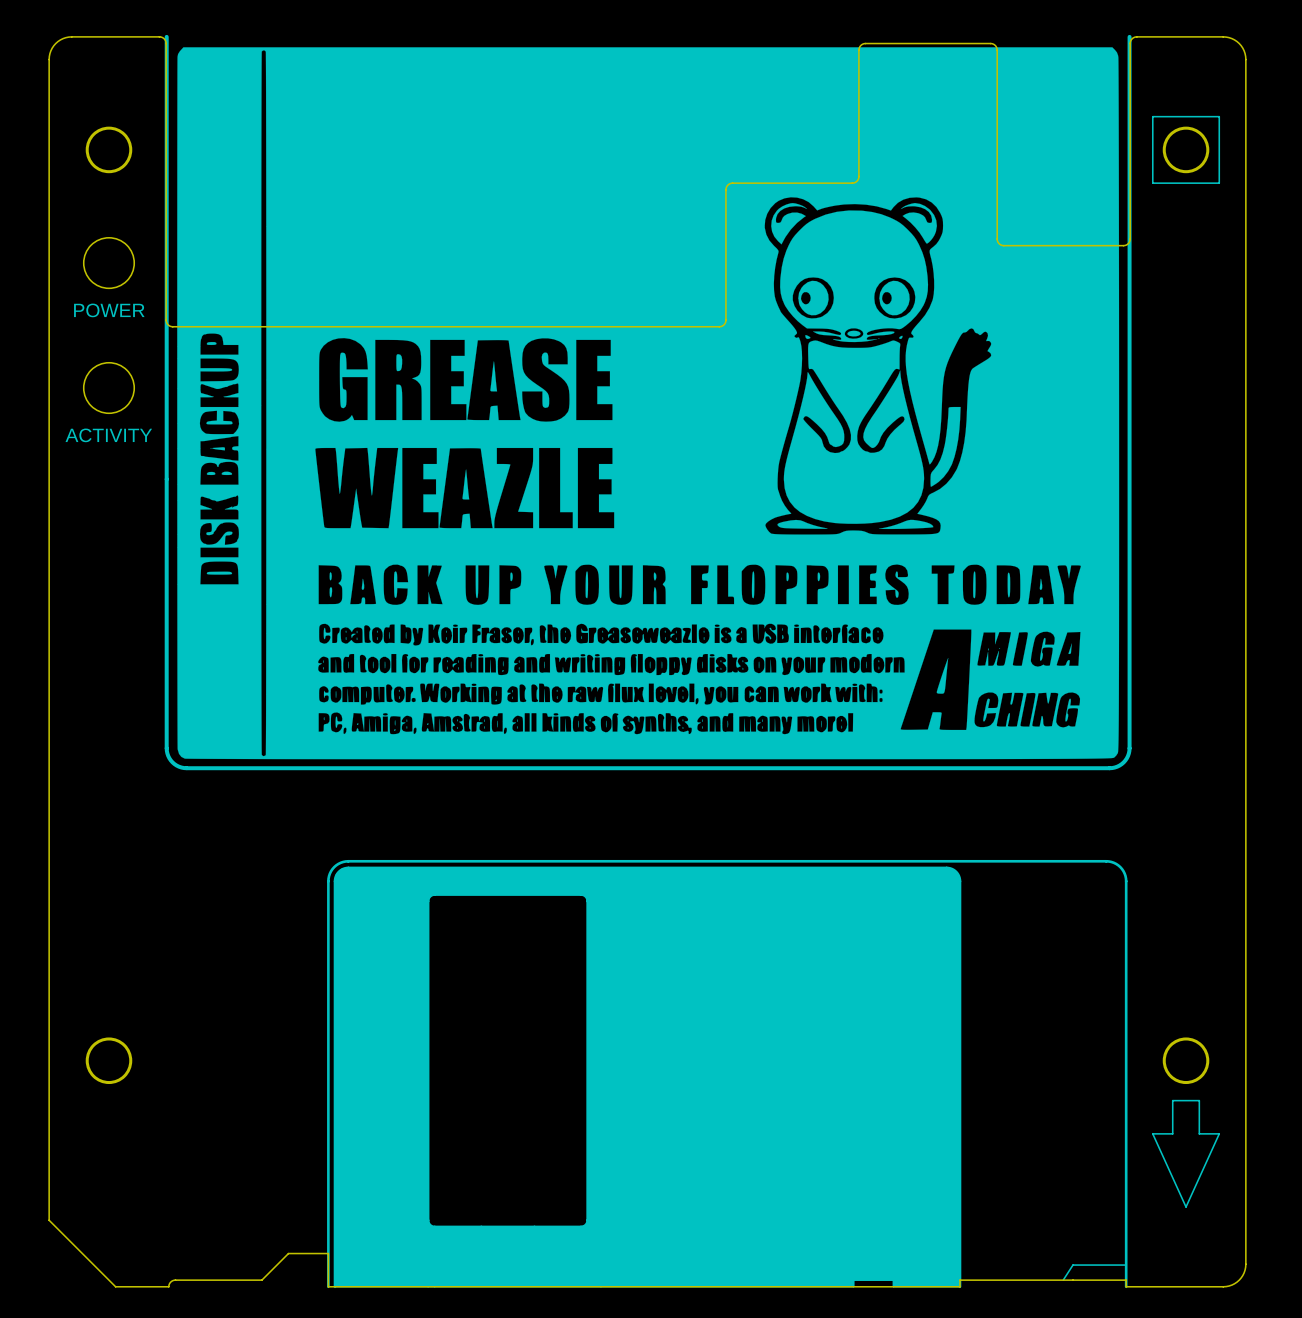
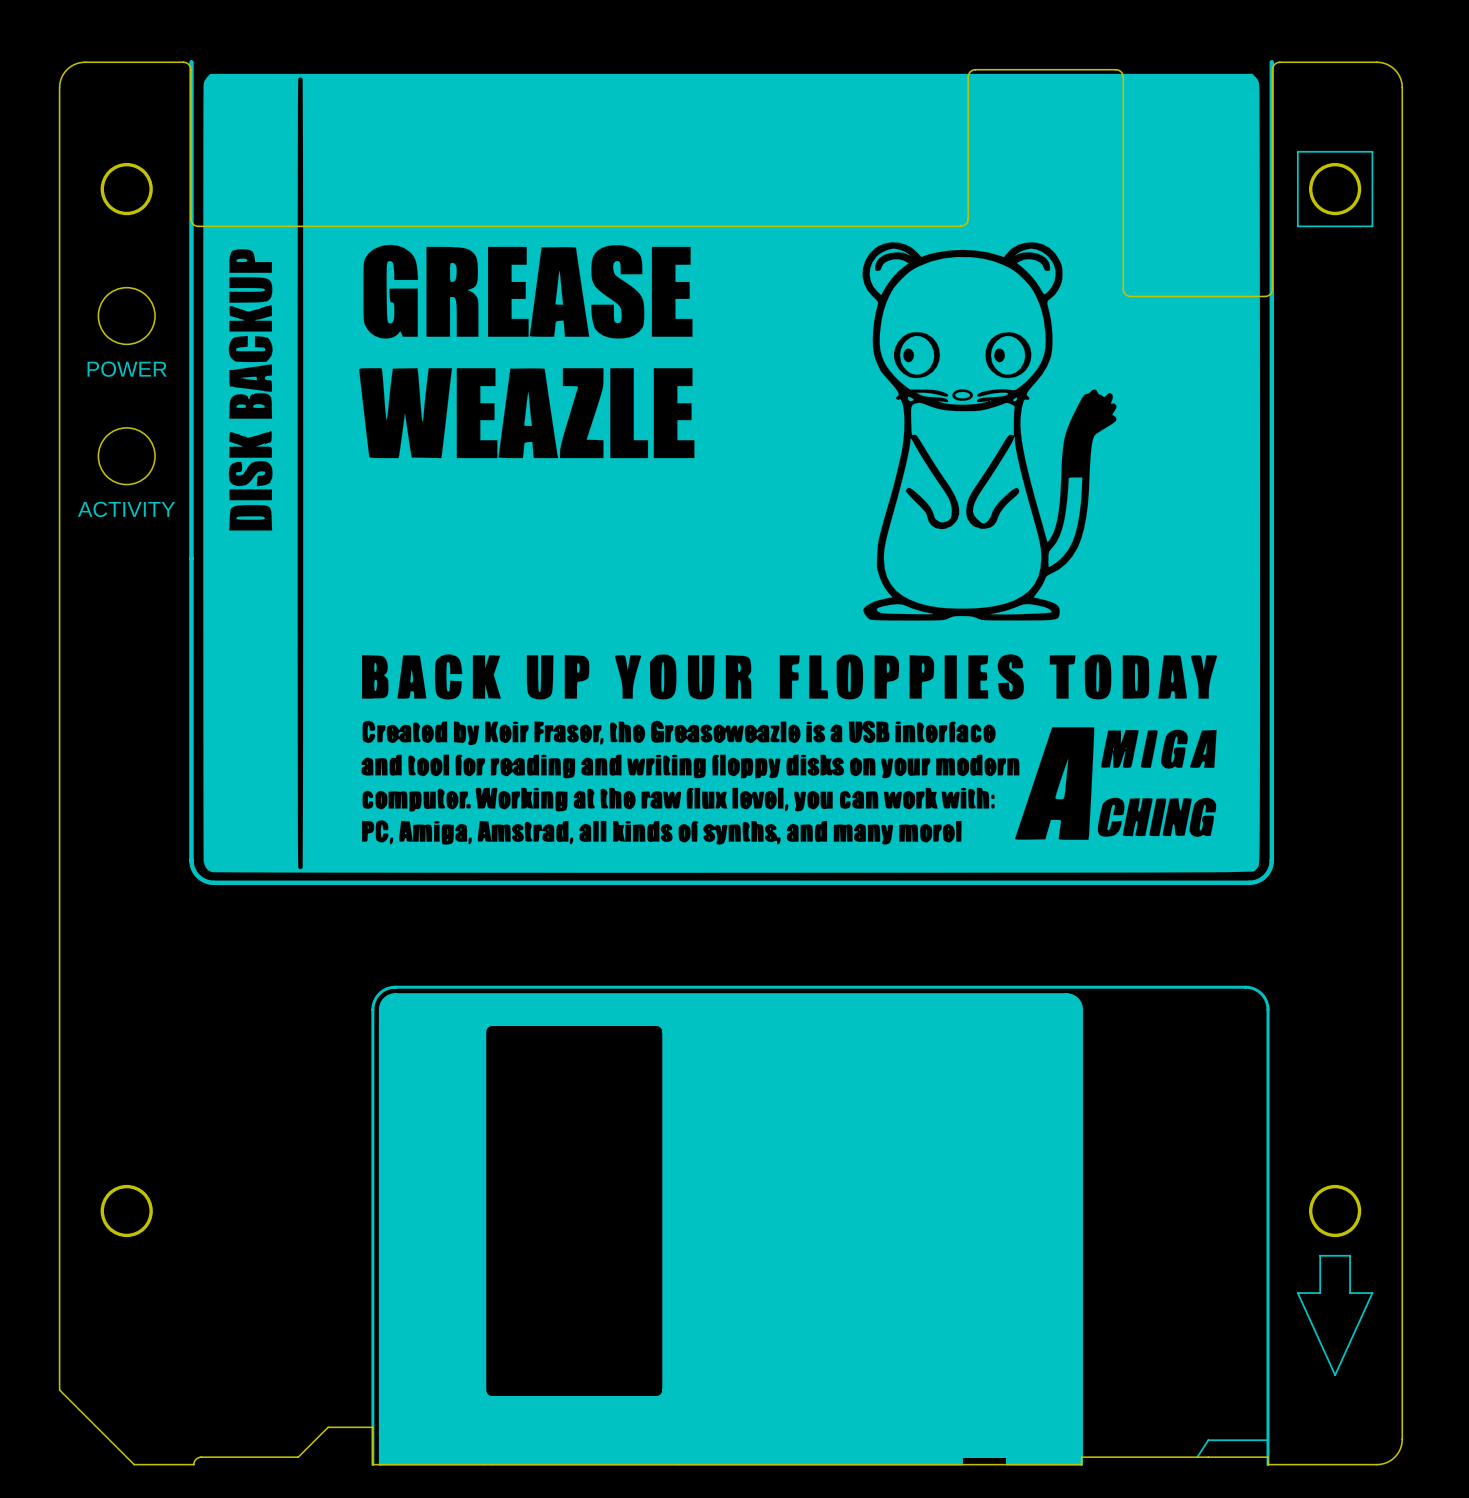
drawing shape: [177, 47, 1120, 760] -> [203, 73, 1261, 873]
board edge: (166, 176) (166, 320) (168, 324) (172, 326) (721, 326) (725, 320) (726, 188) (728, 184) (732, 183) -> (190, 218) (193, 224) (198, 226) (826, 226)

